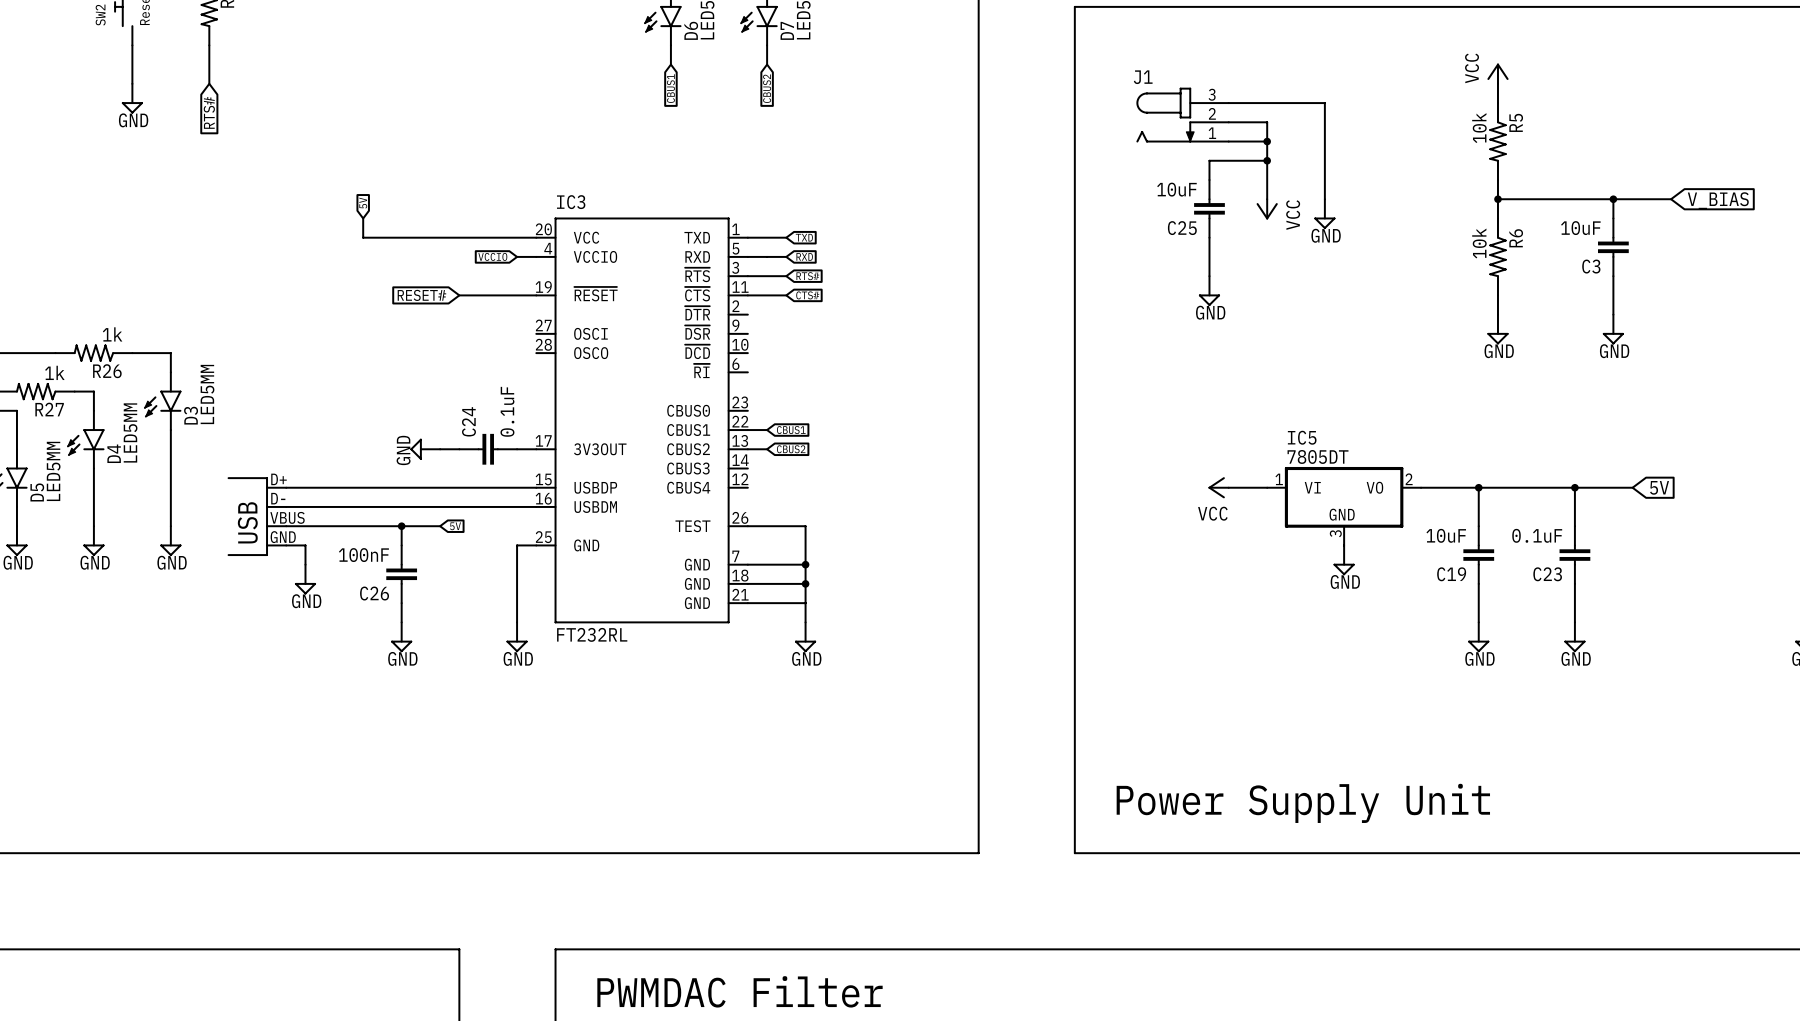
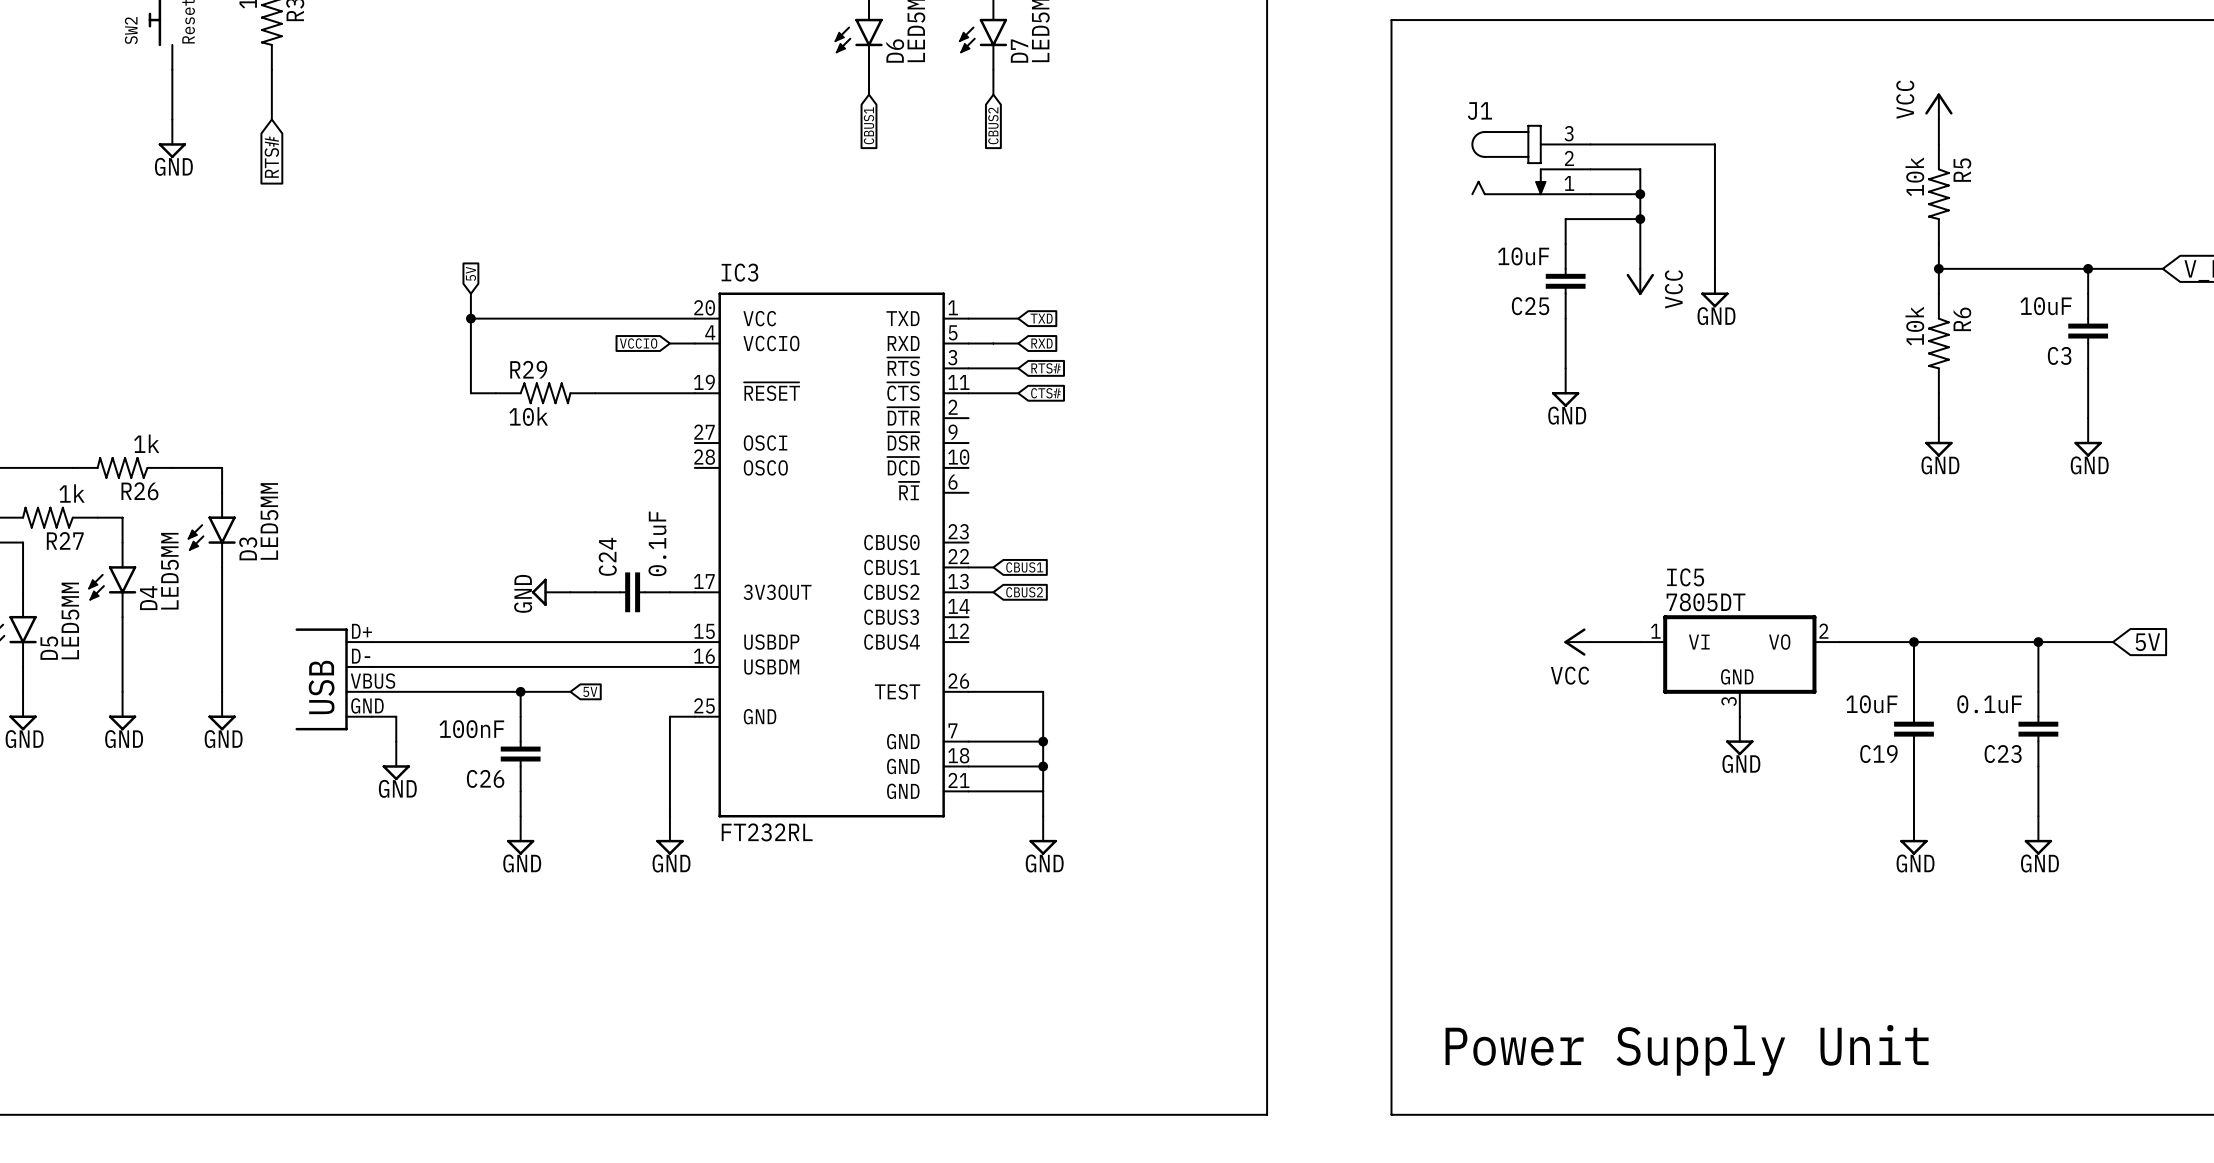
wire: none -> (470, 318) (470, 393) (495, 393)
junction: none -> (470, 318)
R29: none -> 10k (545, 393)
global label: RESET# (421, 295) -> none

